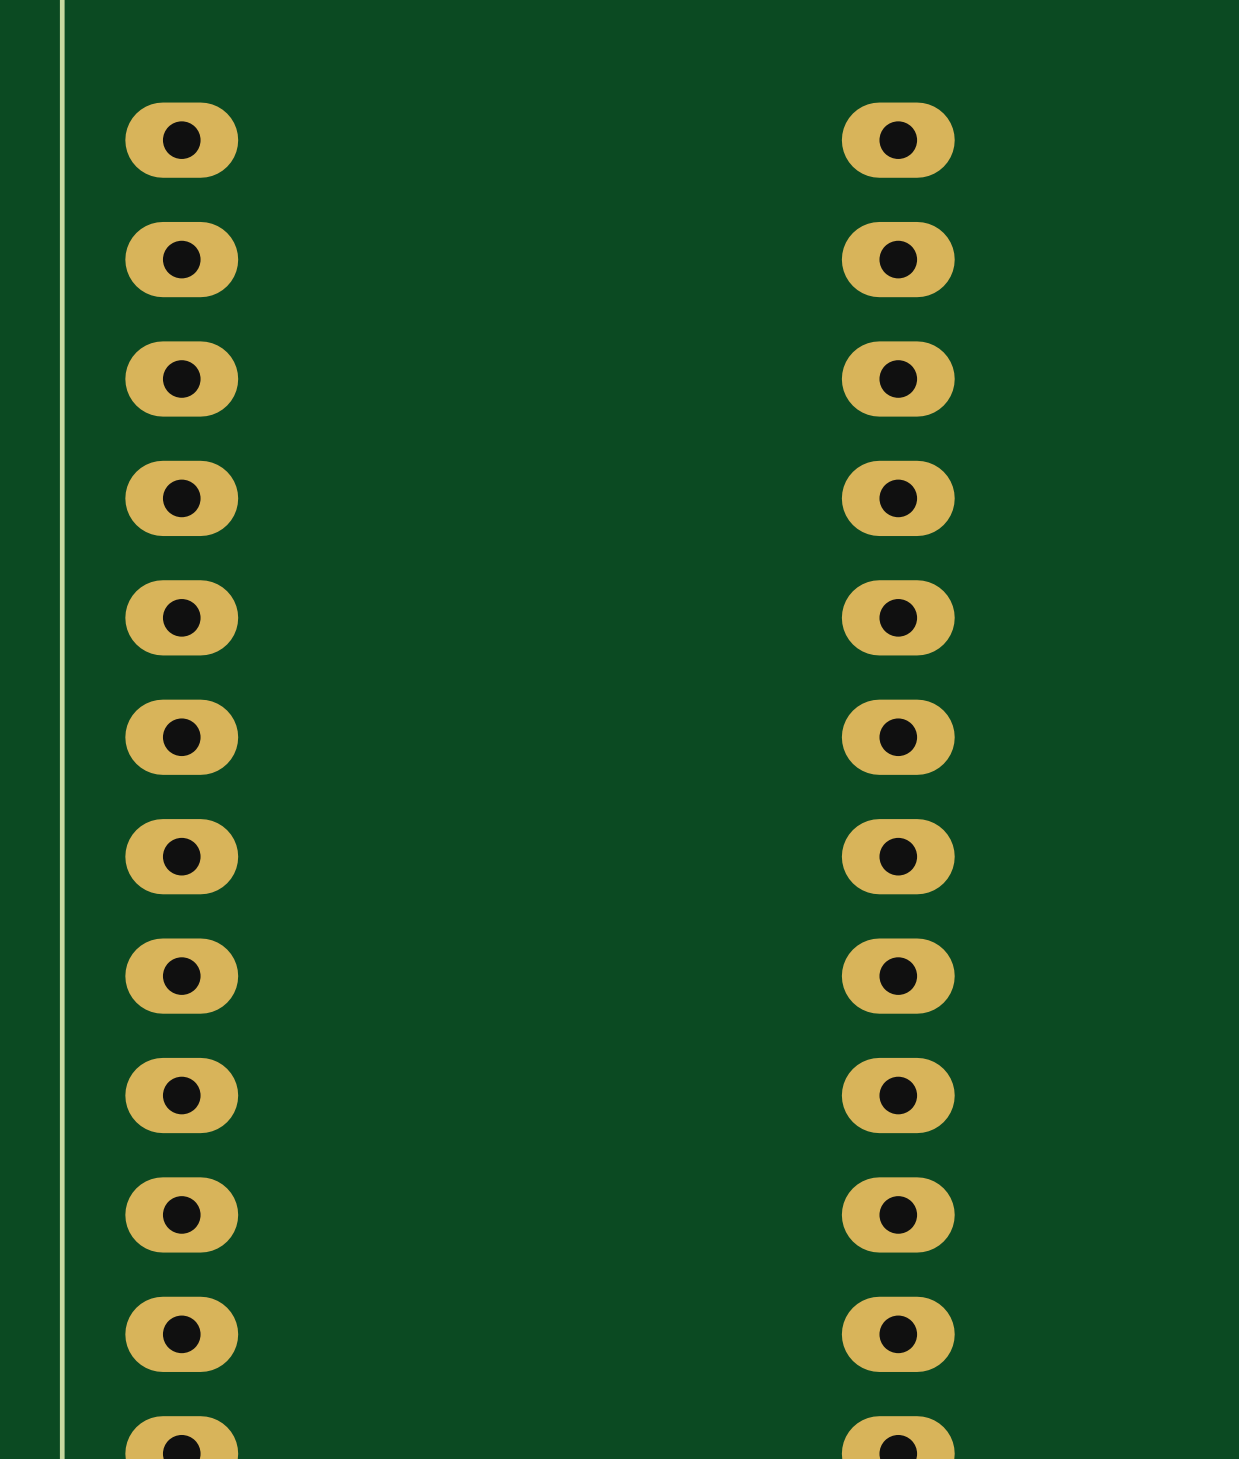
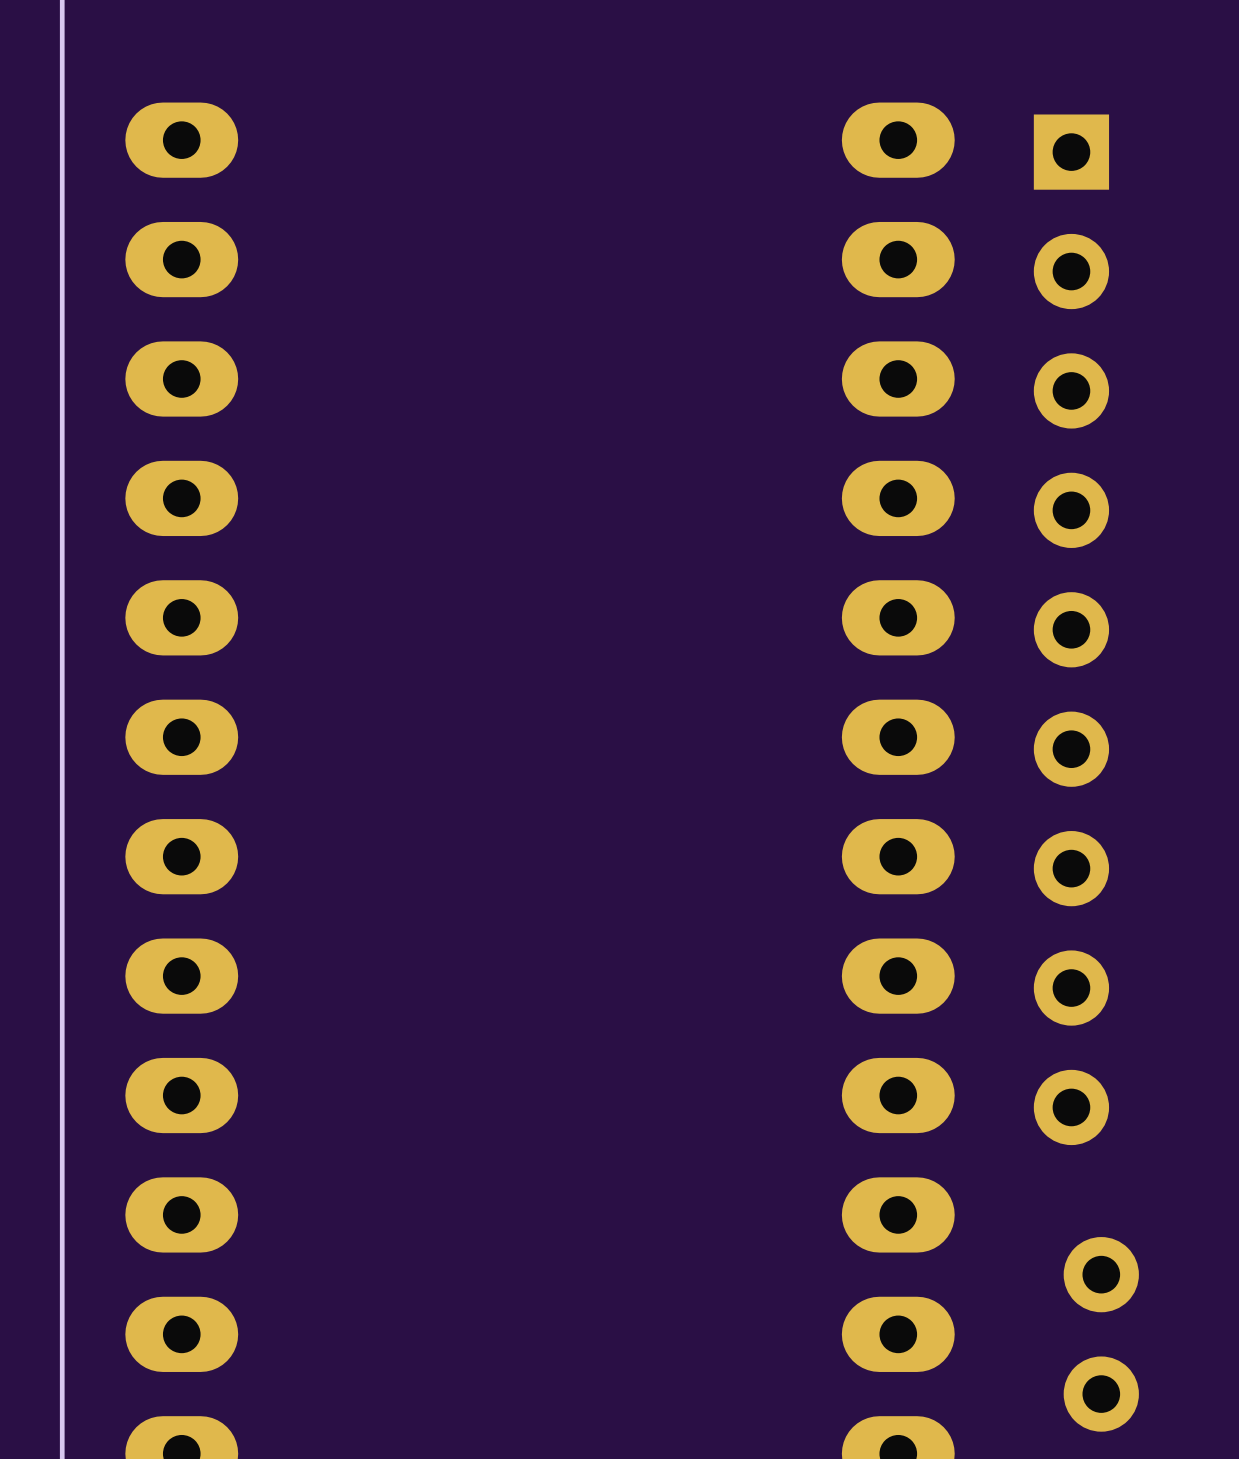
part: none -> (1071, 629)
part: none -> (1101, 1334)

